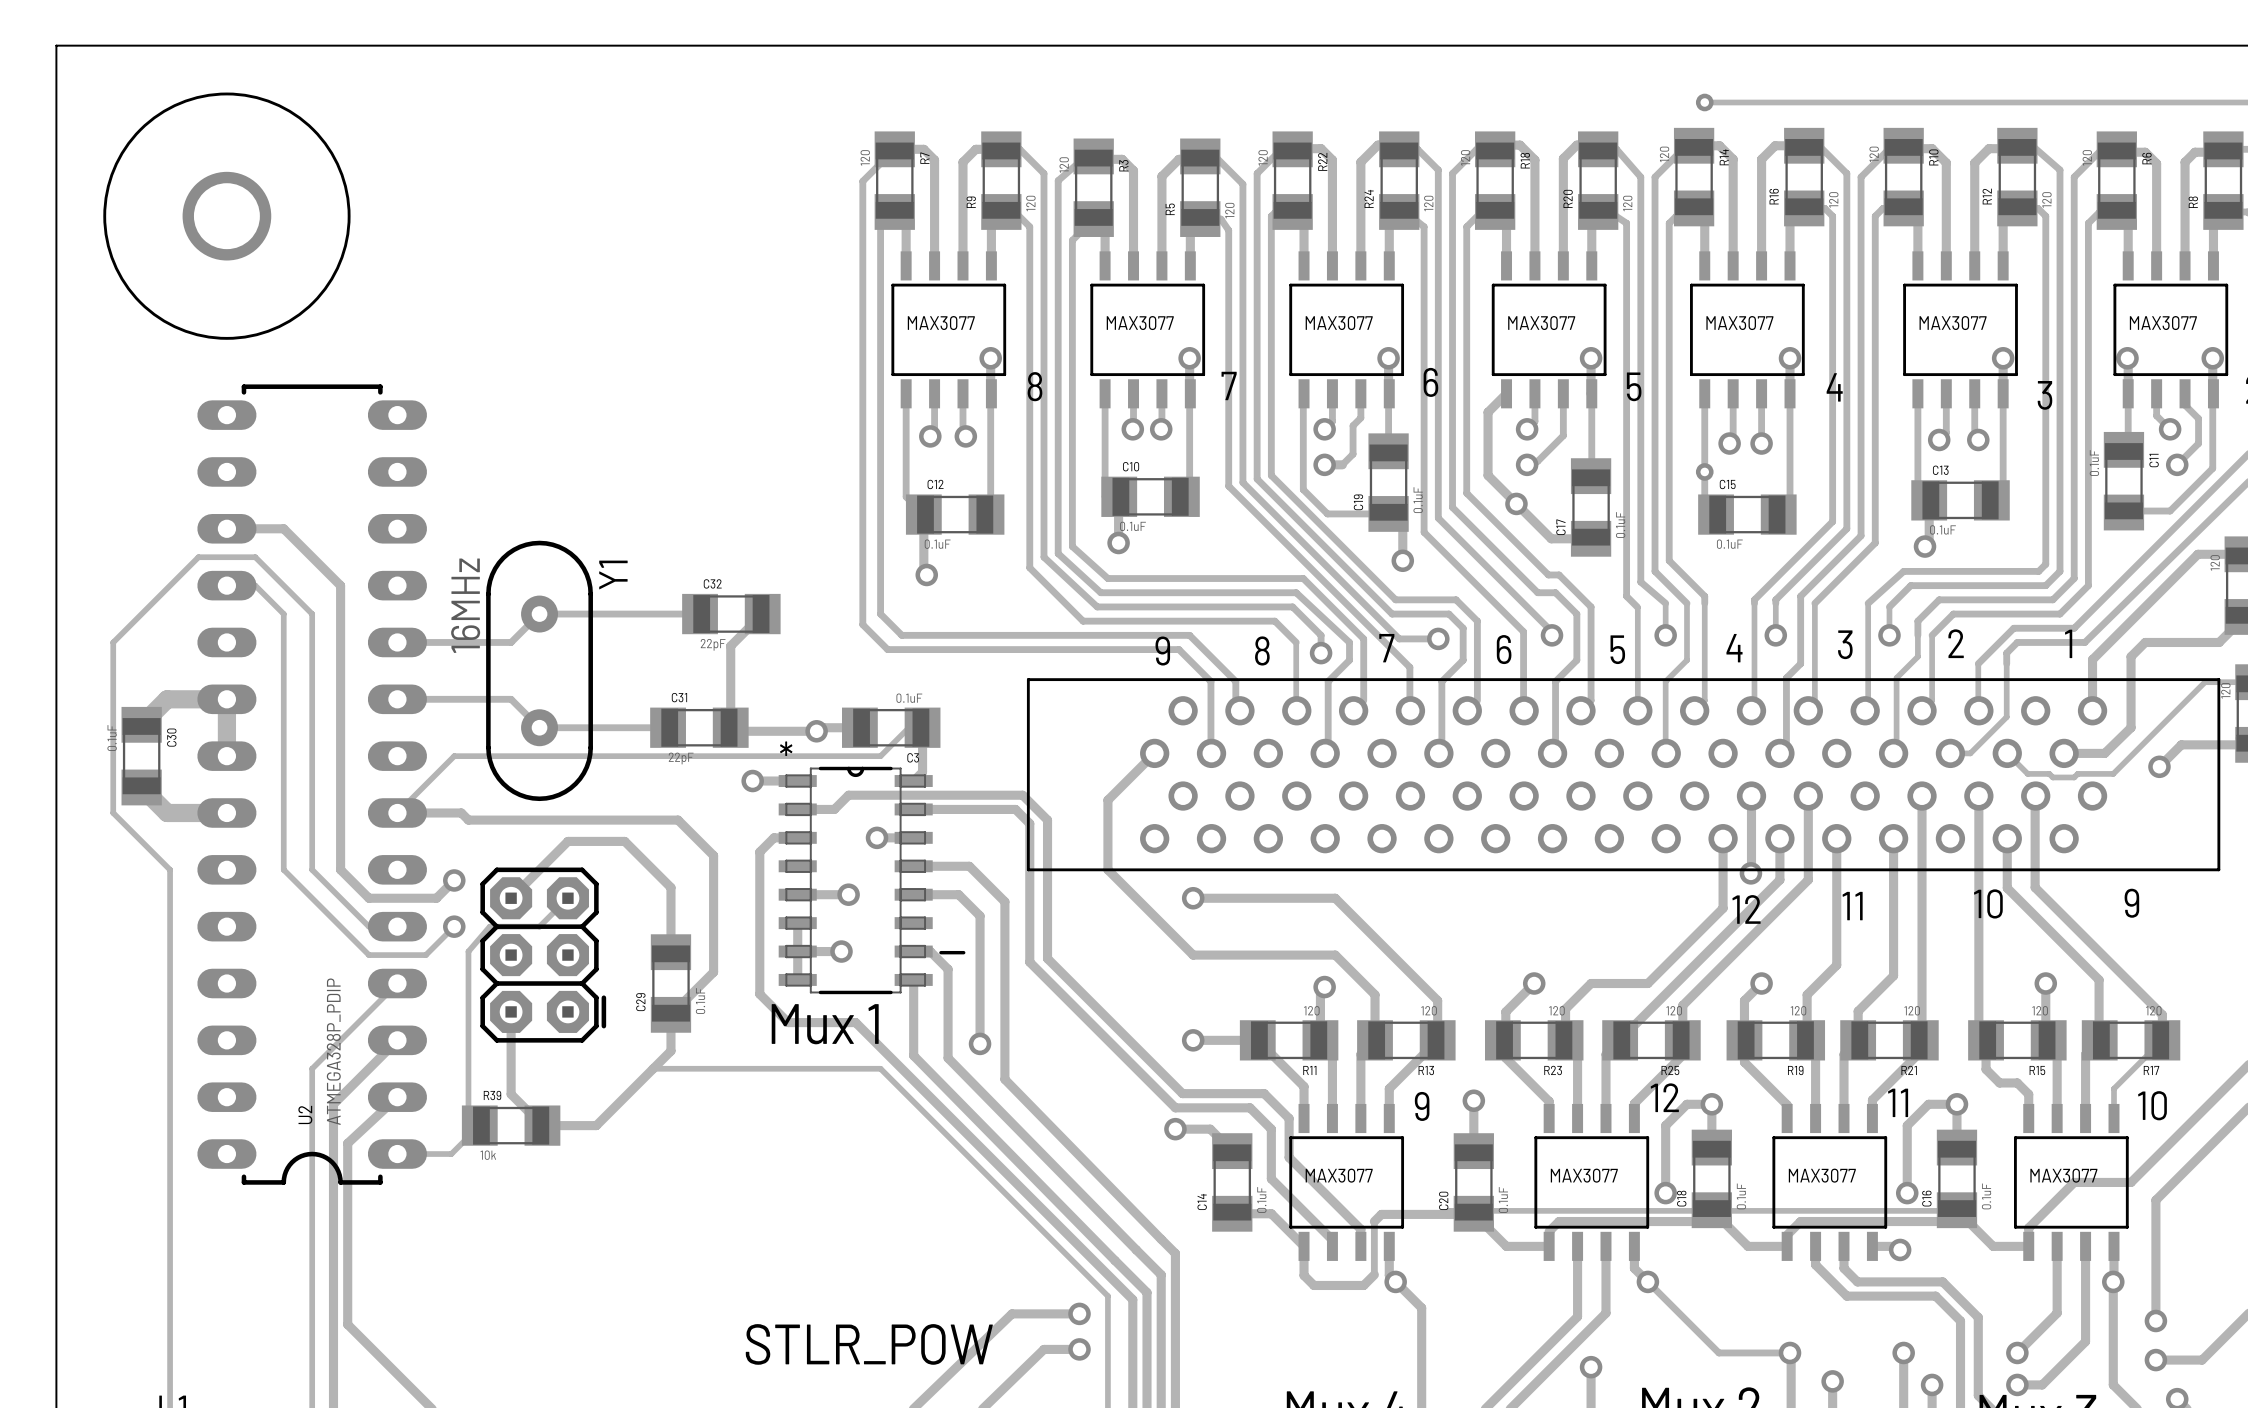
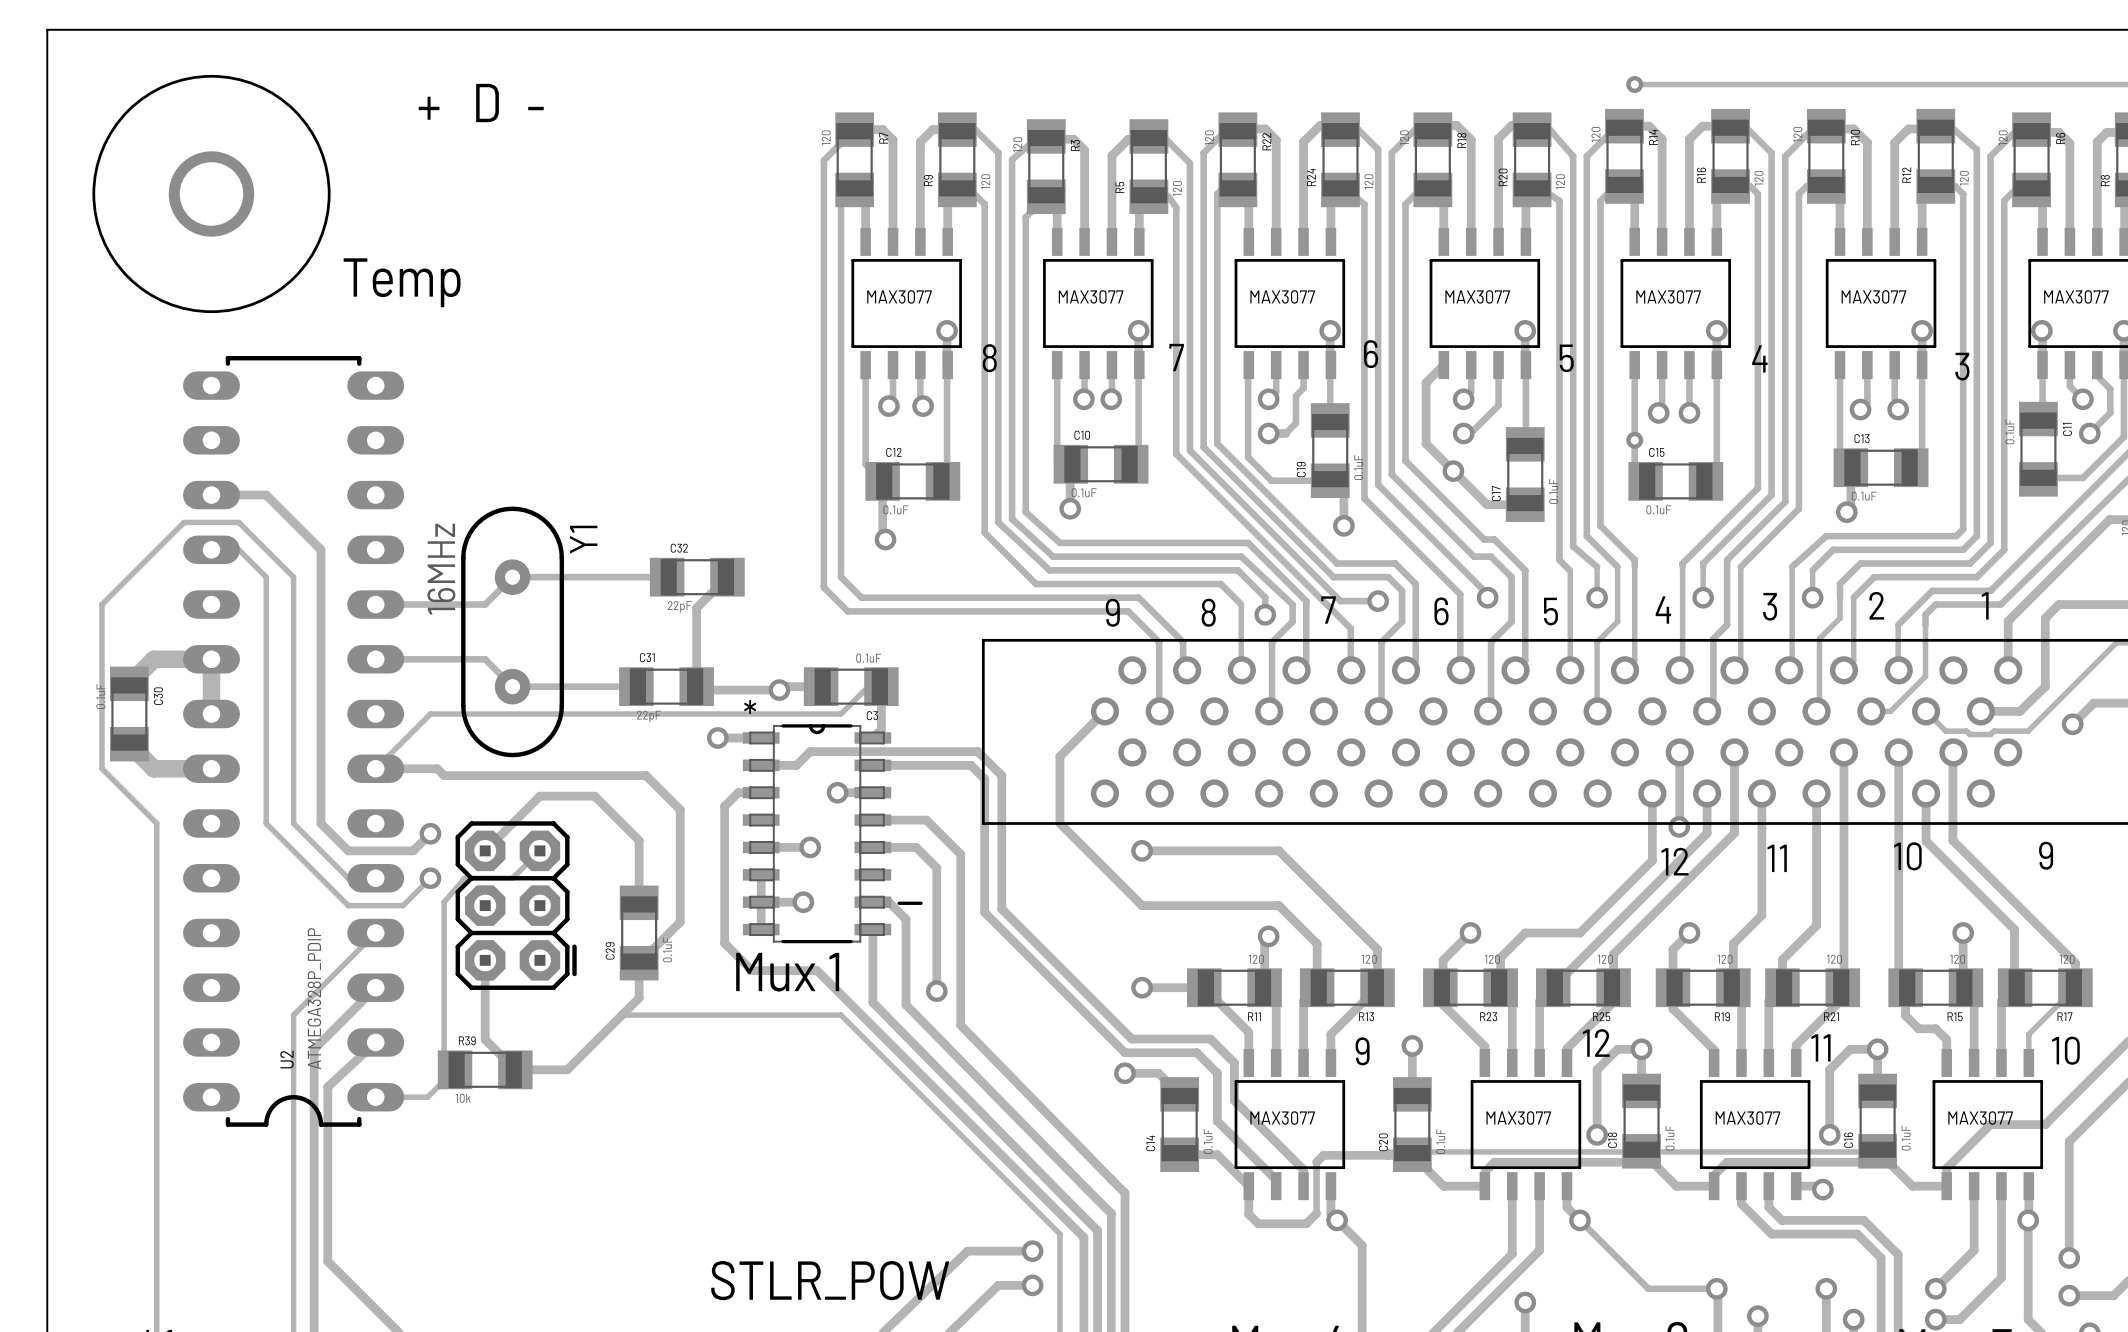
text: none -> D (487, 102)
text: none -> + (429, 108)
text: none -> - (535, 108)
text: none -> Temp (402, 282)

